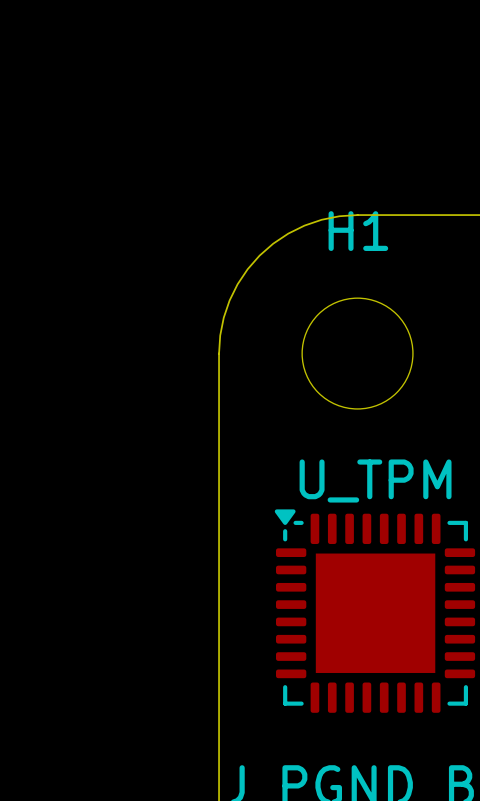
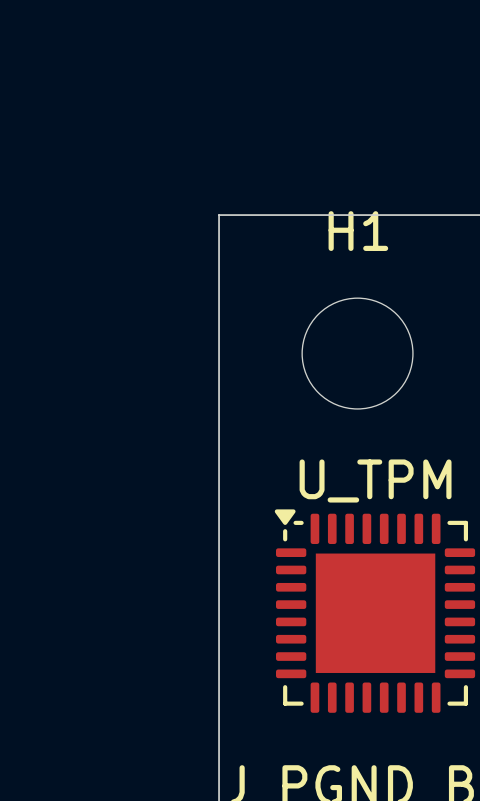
board edge: (357, 215) (339, 216) (304, 225) (273, 243) (259, 255) (247, 269) (229, 300) (223, 317) (219, 353) -> (357, 215) (219, 215) (219, 353)

